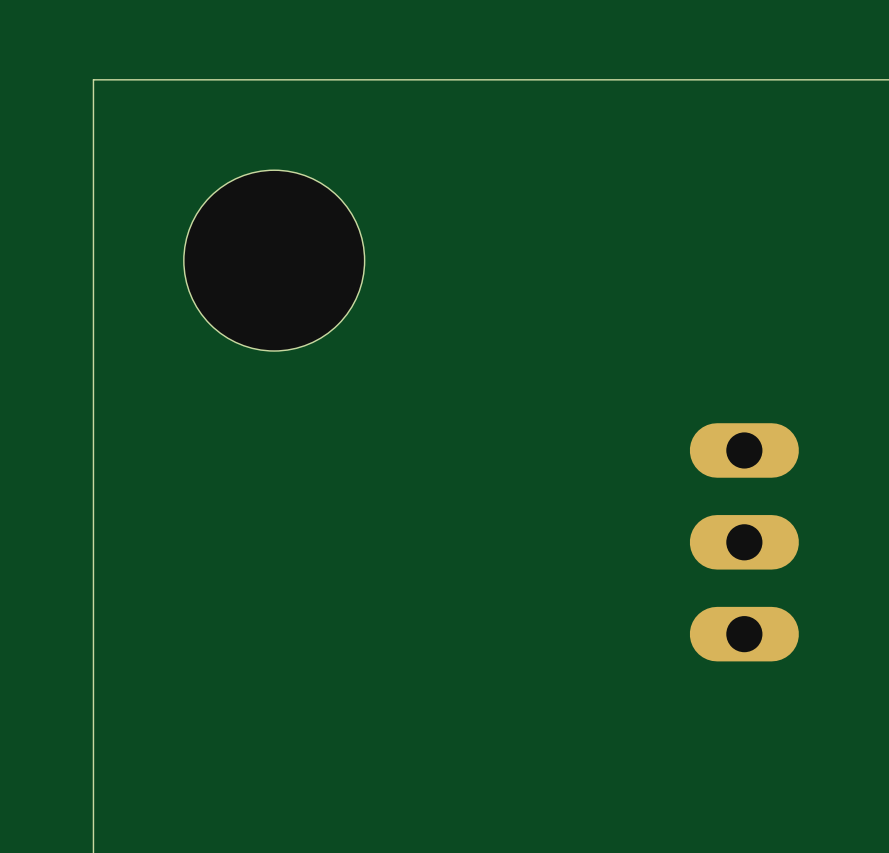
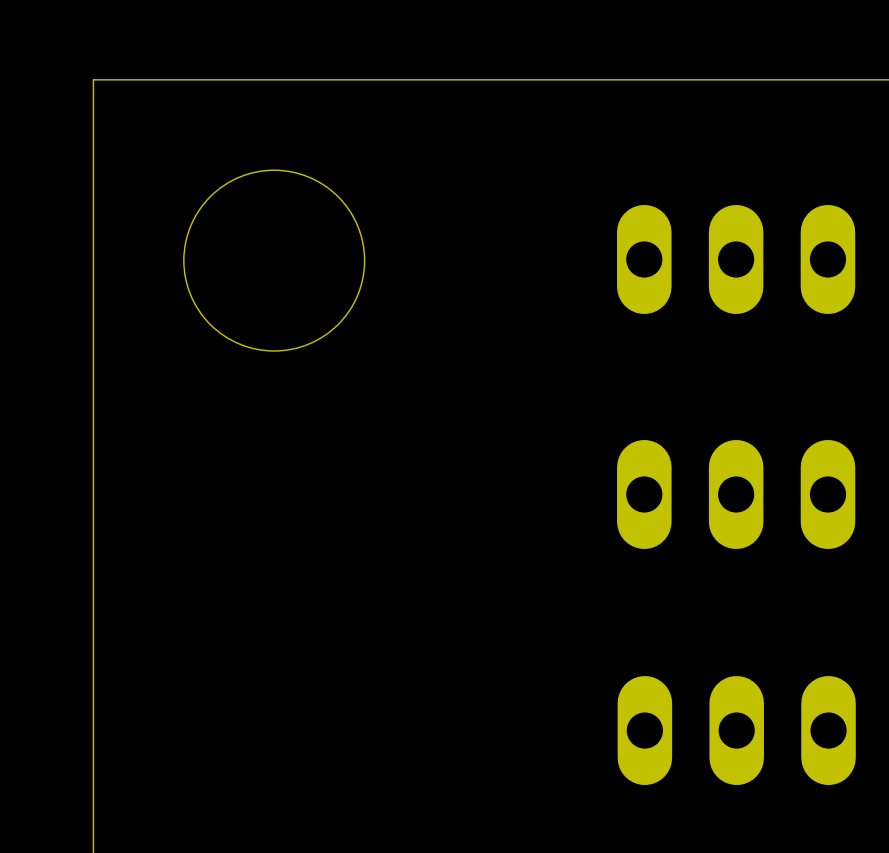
part: none -> (736, 259)
part rotation: 0° (744, 542) -> 90° clockwise (736, 494)
part: none -> (736, 730)

